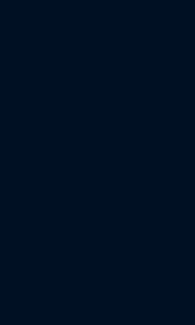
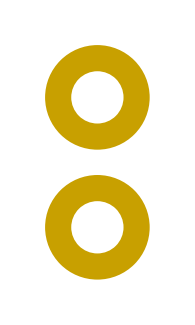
part: none -> (97, 97)
part: none -> (97, 227)

